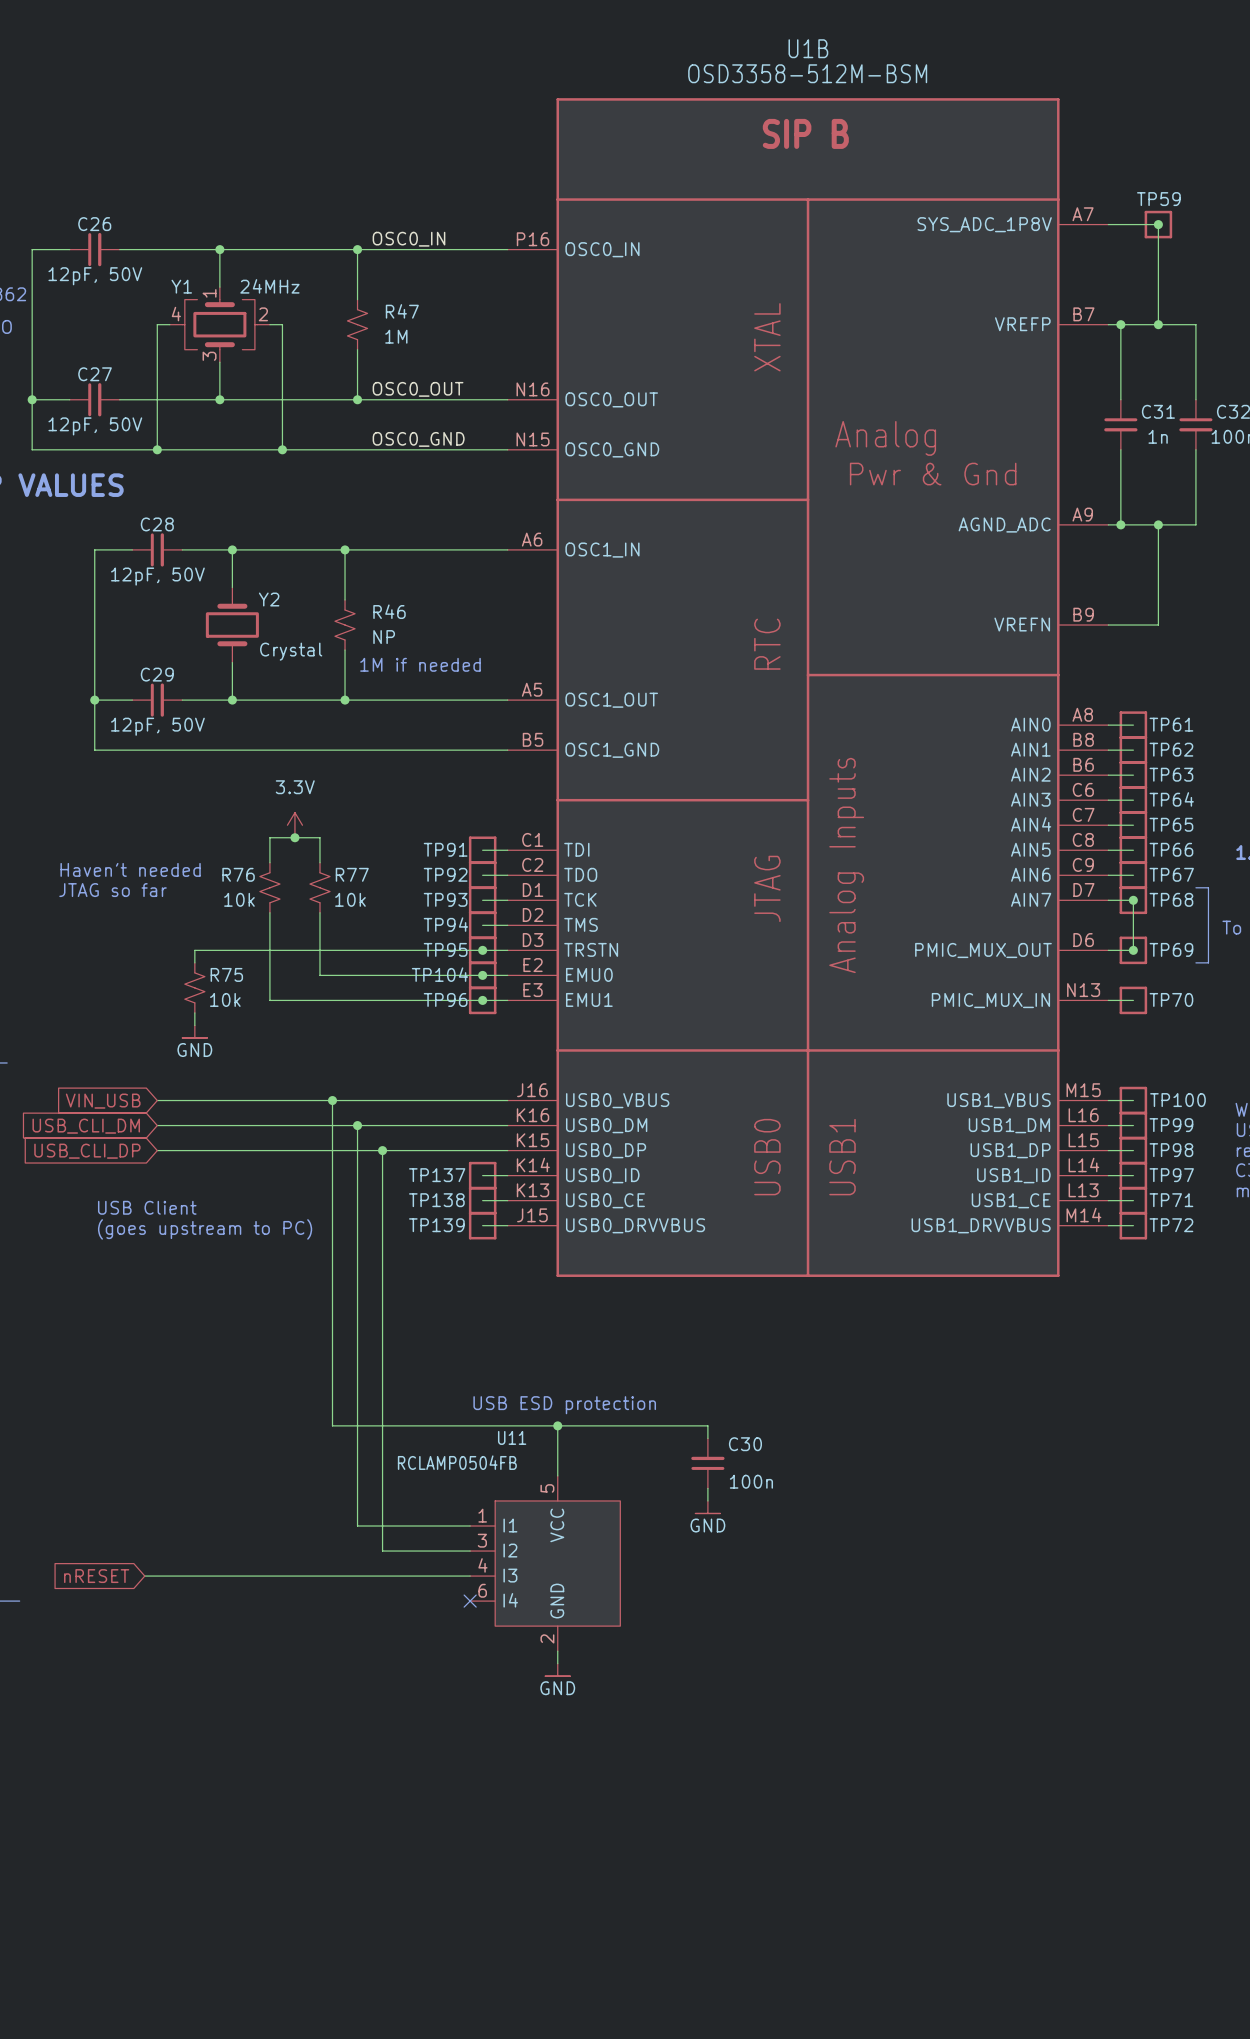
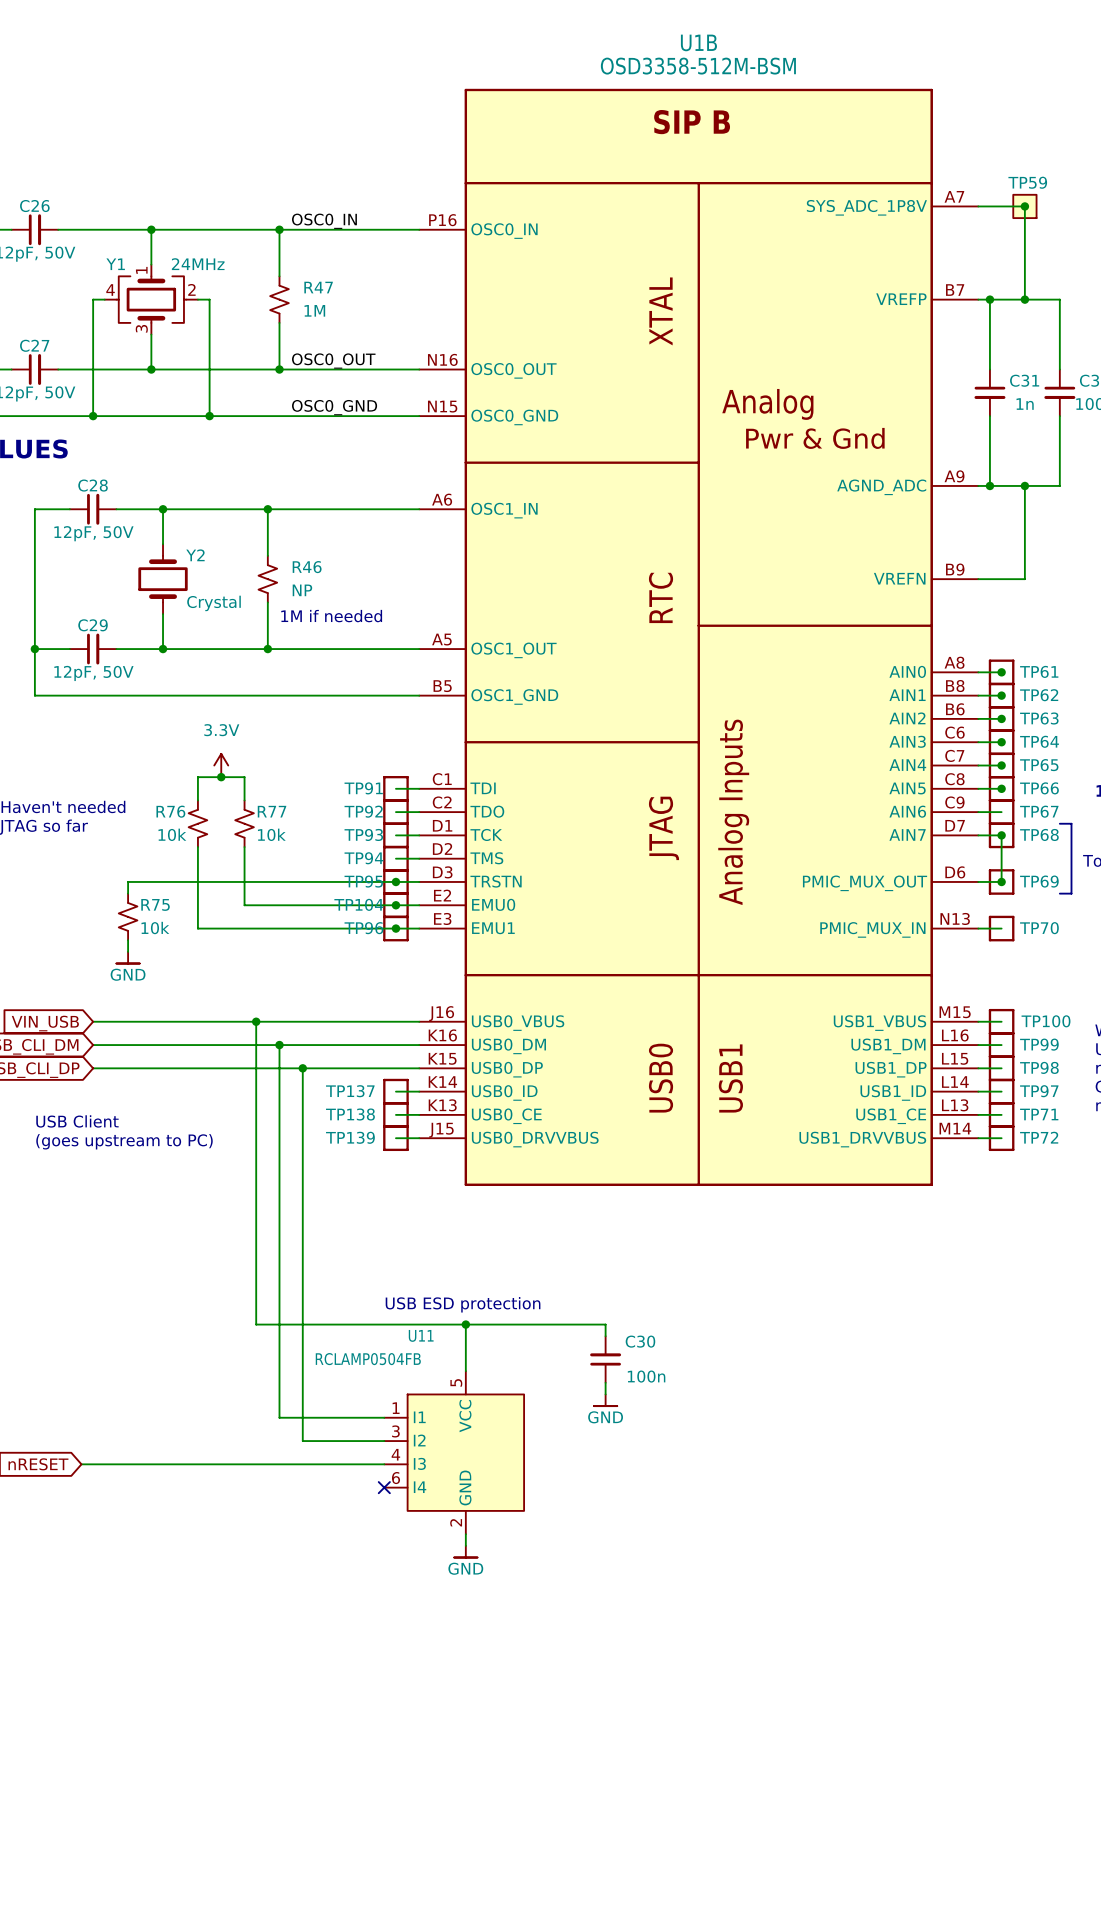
TP59 symbol: [1144, 210, 1173, 239] -> [1013, 194, 1037, 219]
junction: none -> (1001, 672)
junction: none -> (1001, 695)
junction: none -> (1001, 718)
junction: none -> (1001, 742)
junction: none -> (1001, 765)
junction: none -> (1001, 788)

